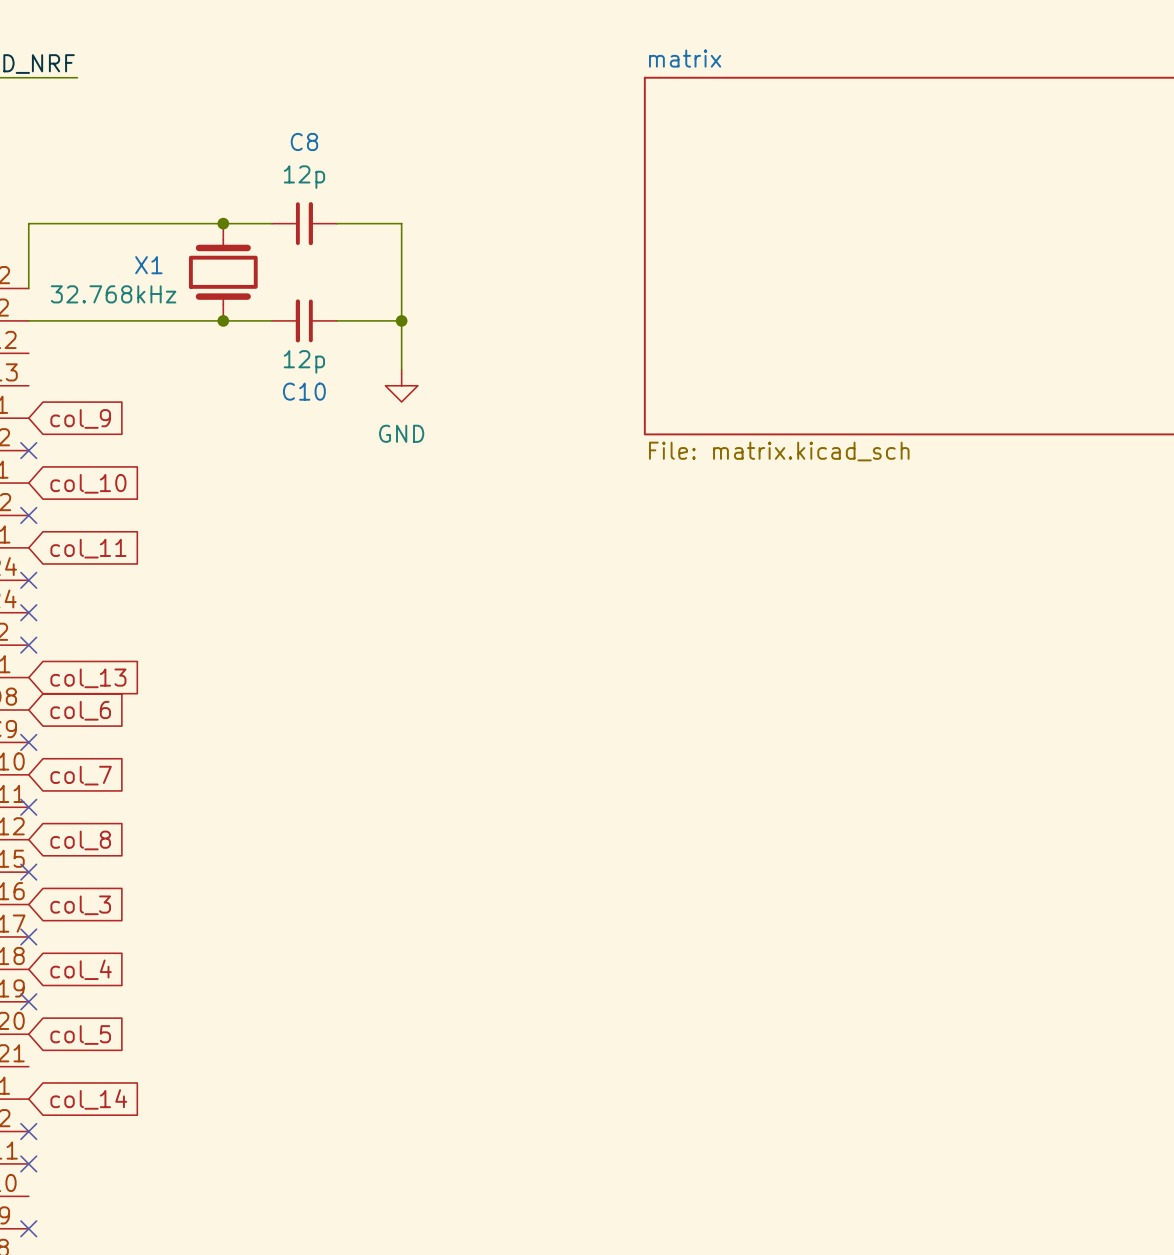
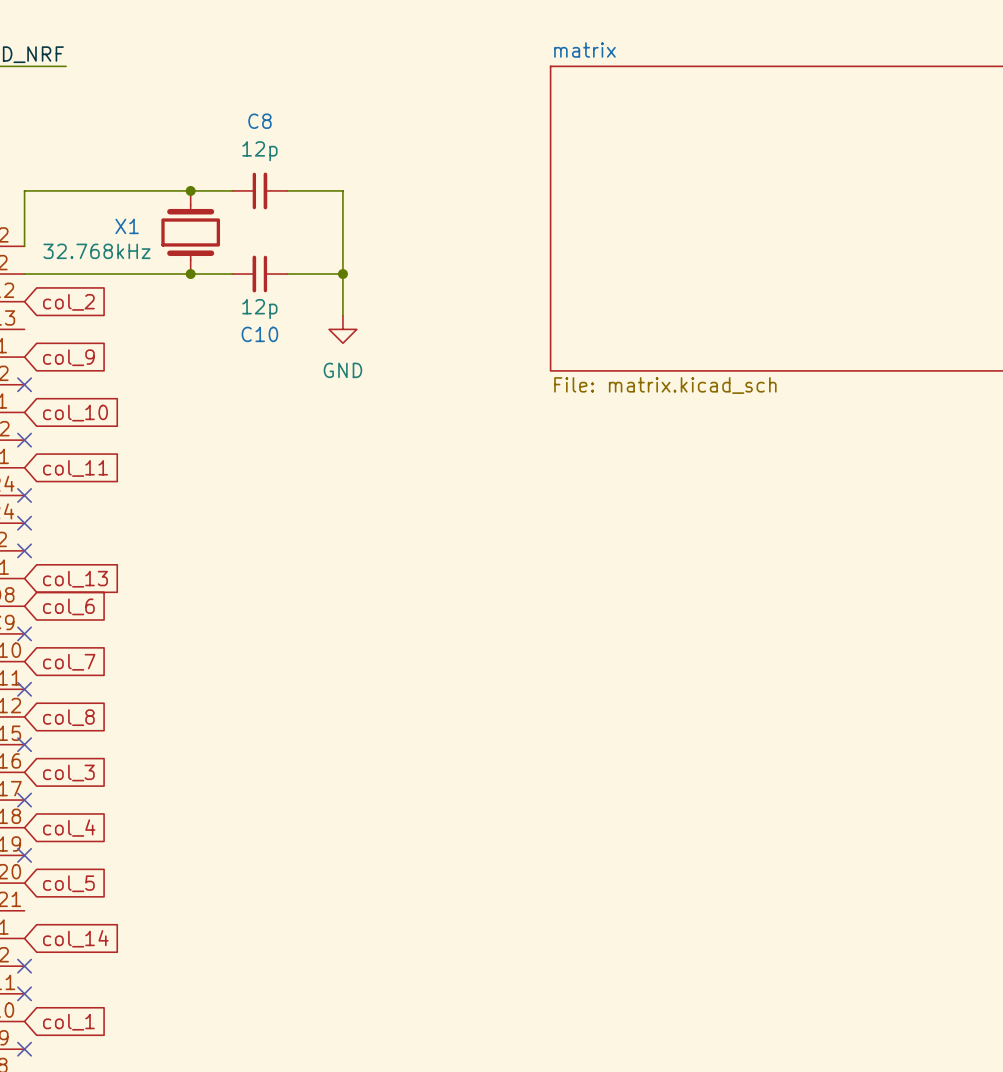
global label: none -> col_2 (68, 302)
global label: none -> col_1 (68, 1022)

